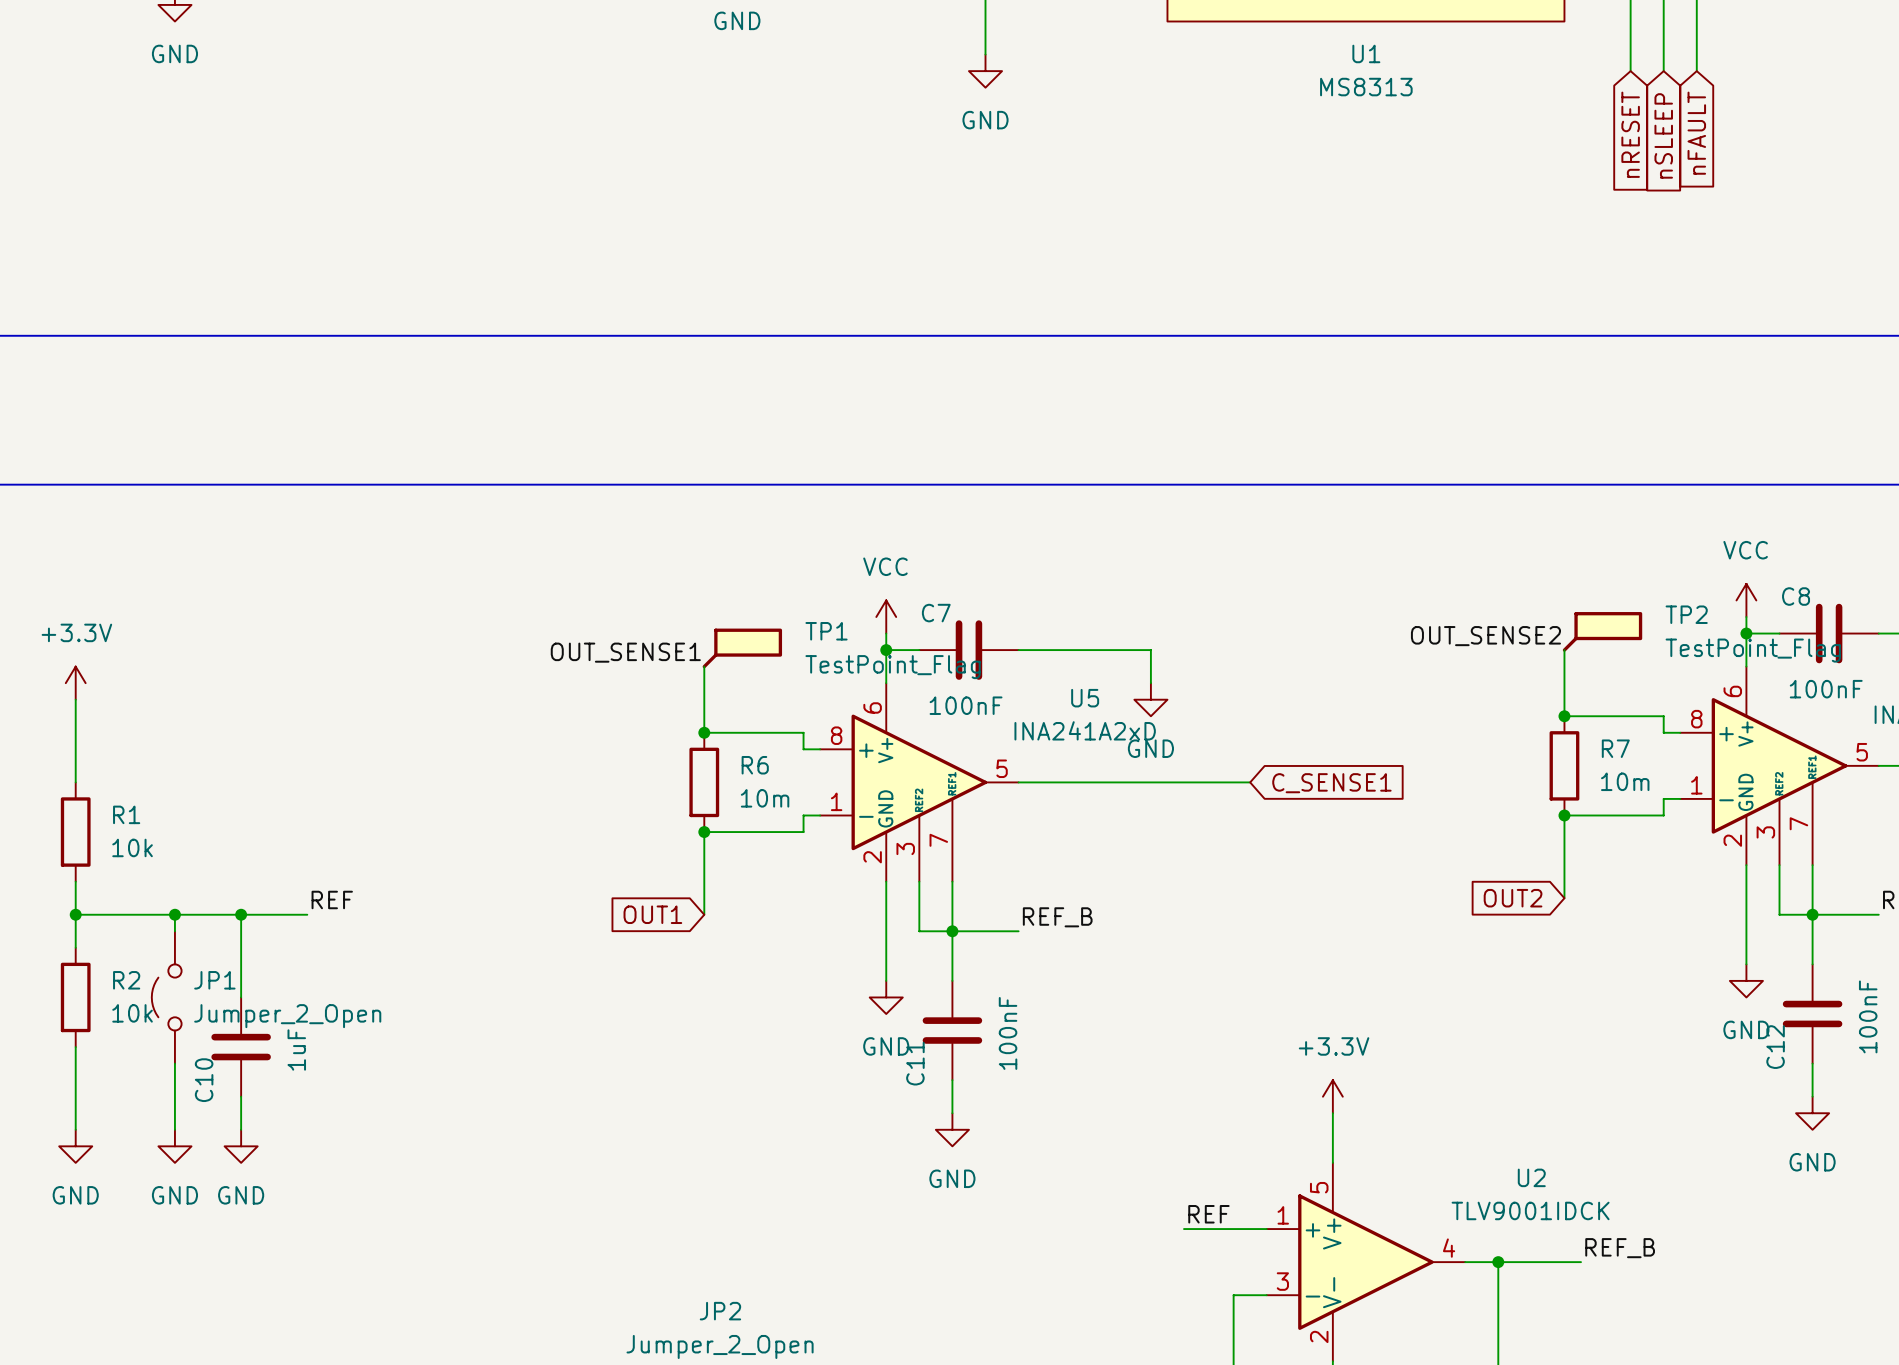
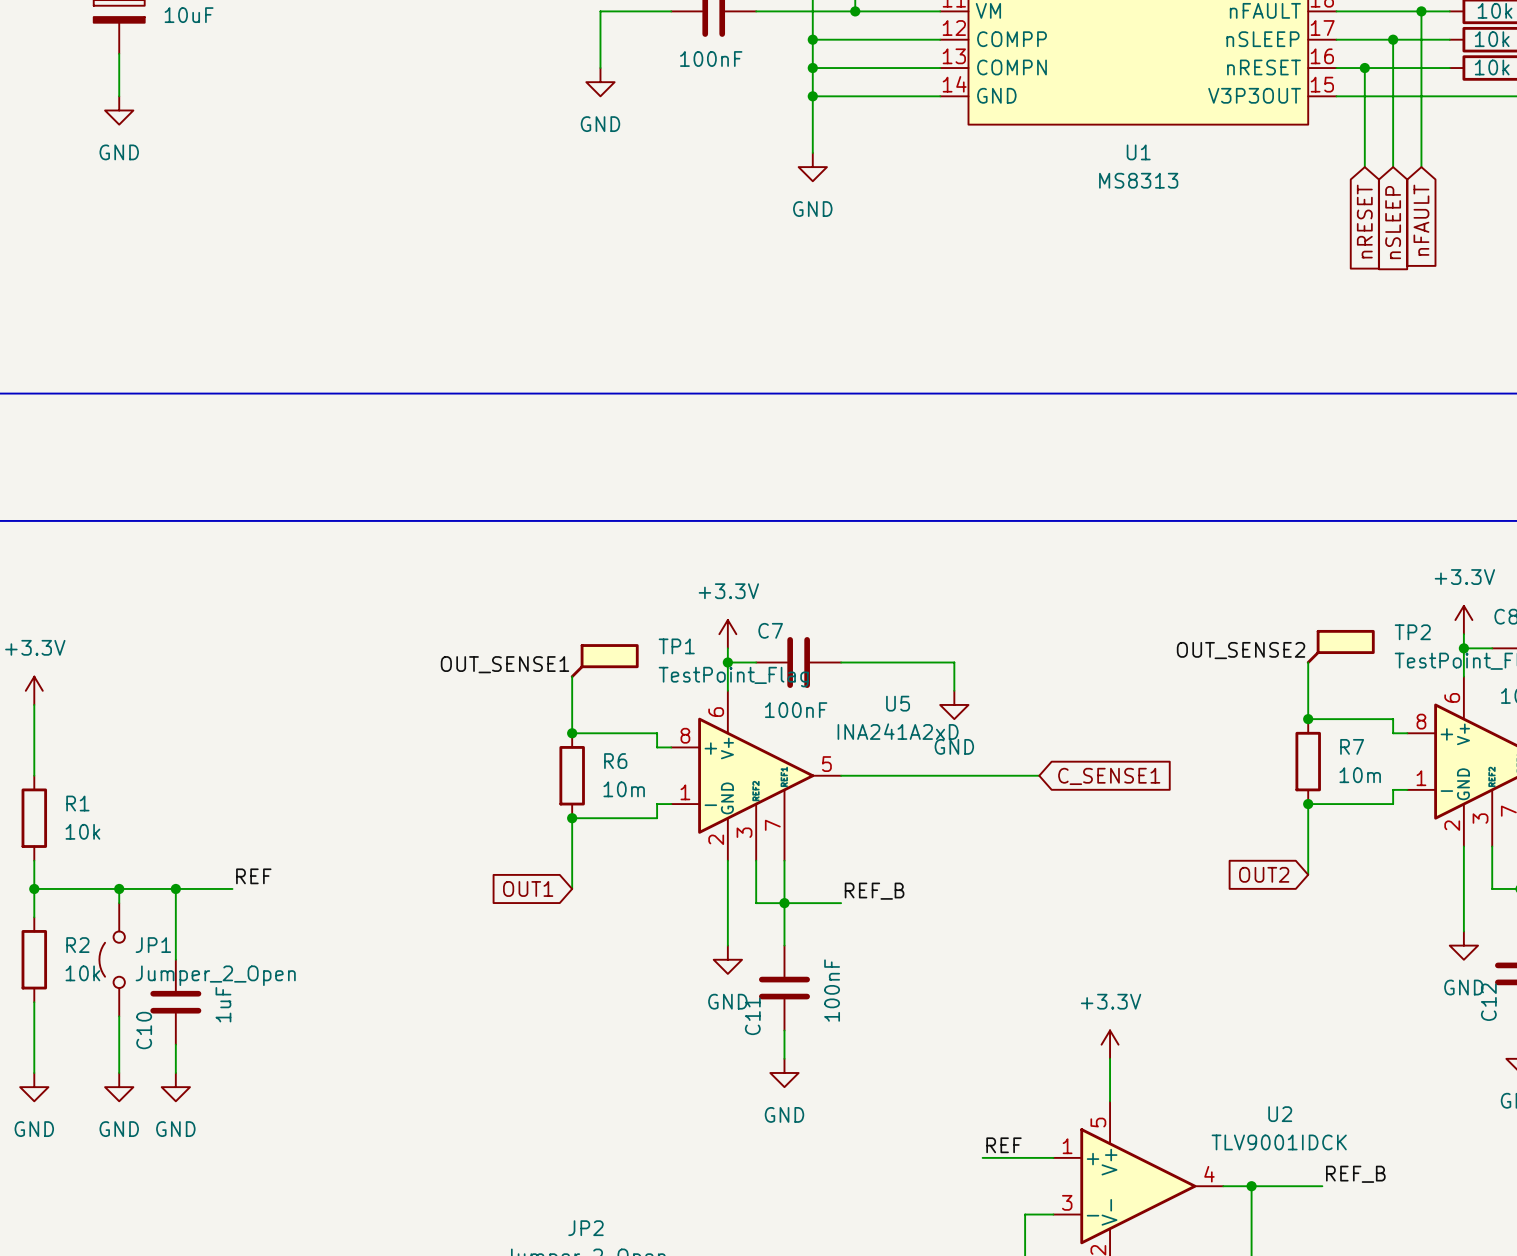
power symbol: VCC (1746, 600) -> +3.3V (1463, 620)
power symbol: VCC (886, 616) -> +3.3V (727, 634)

